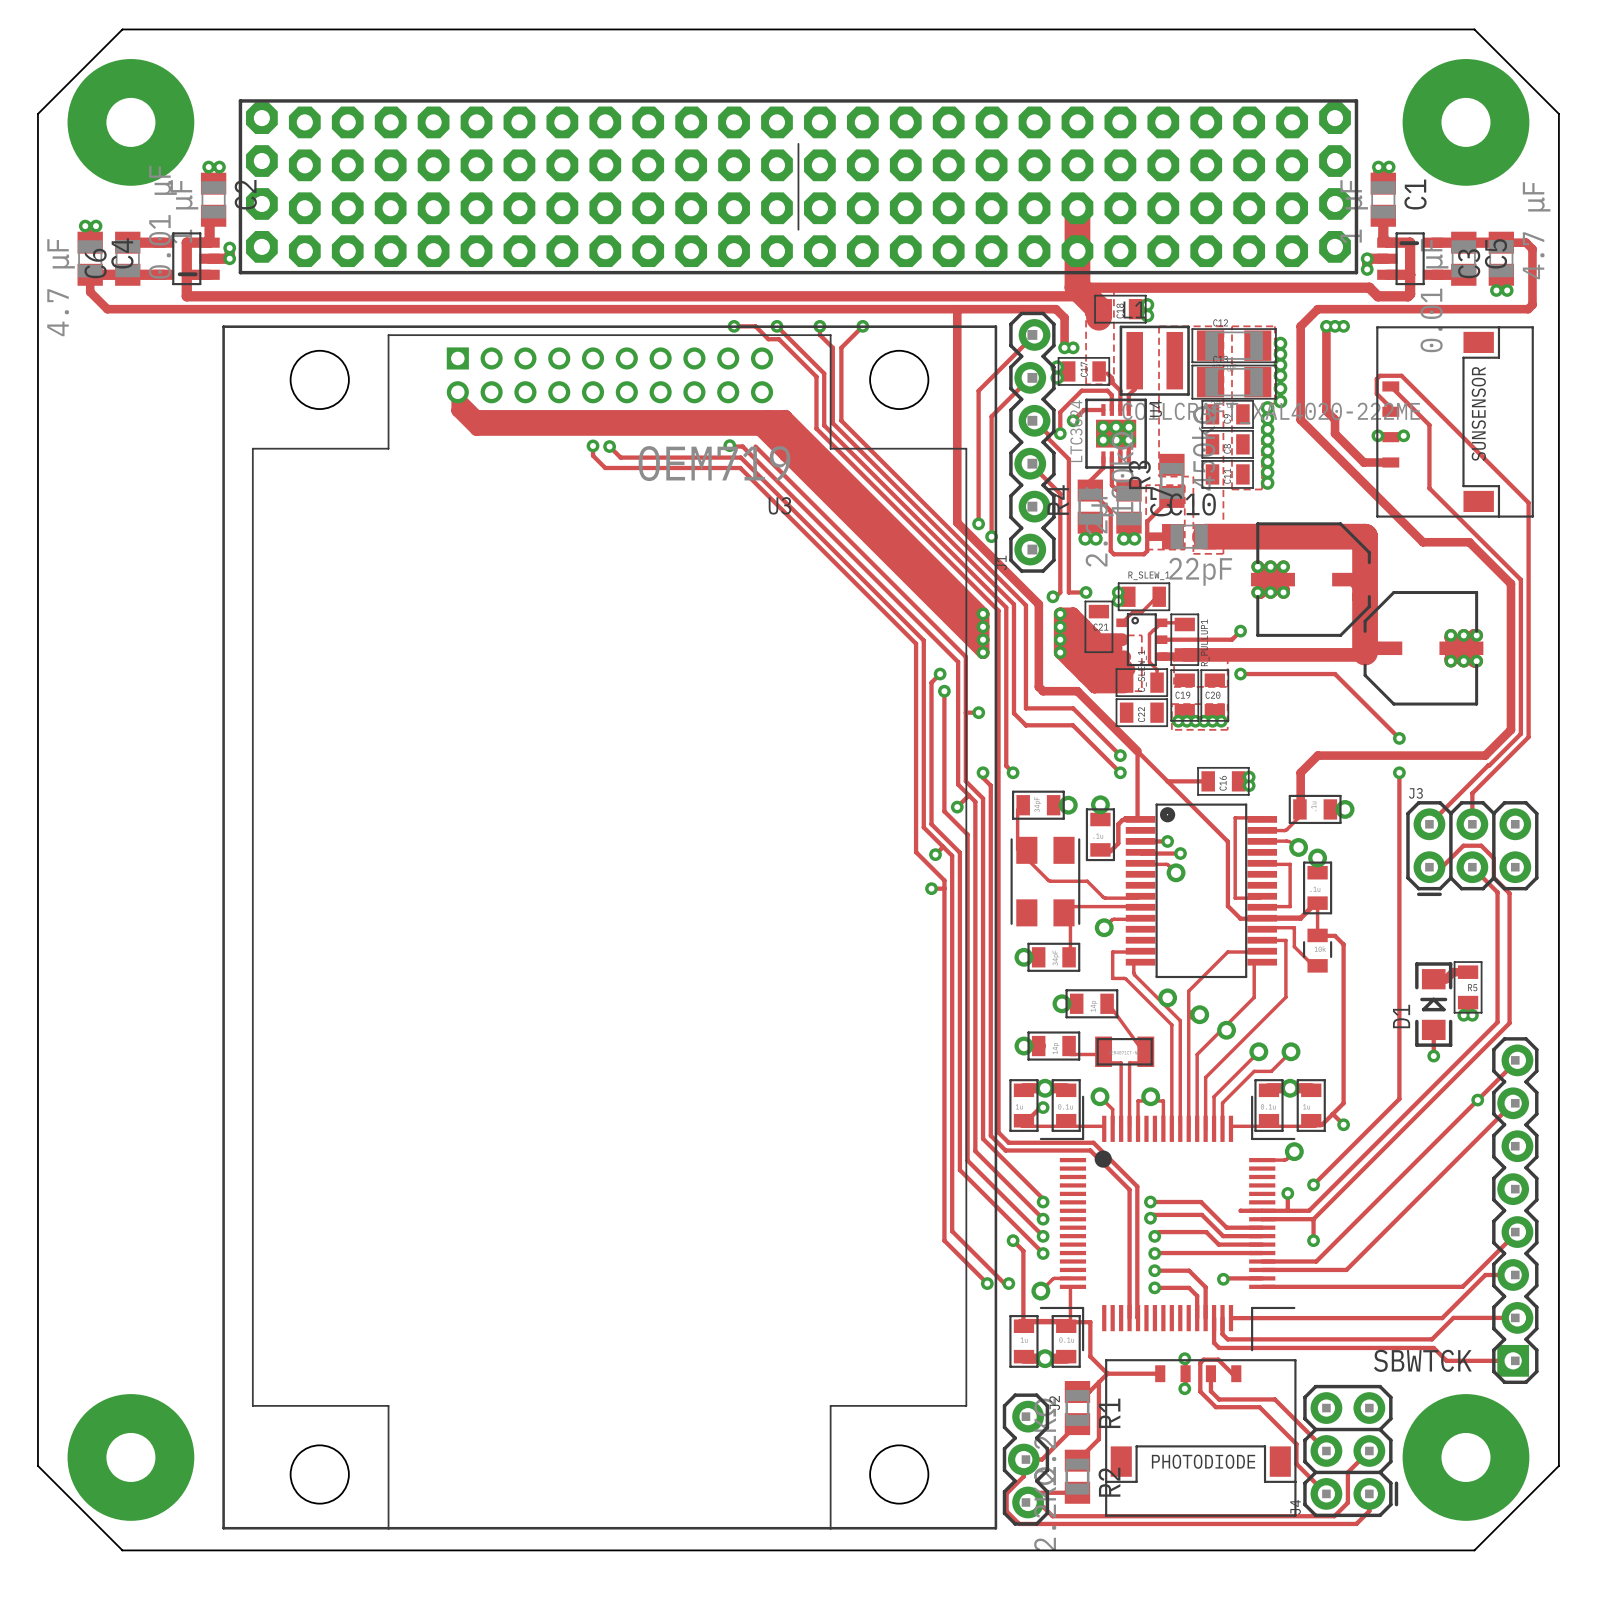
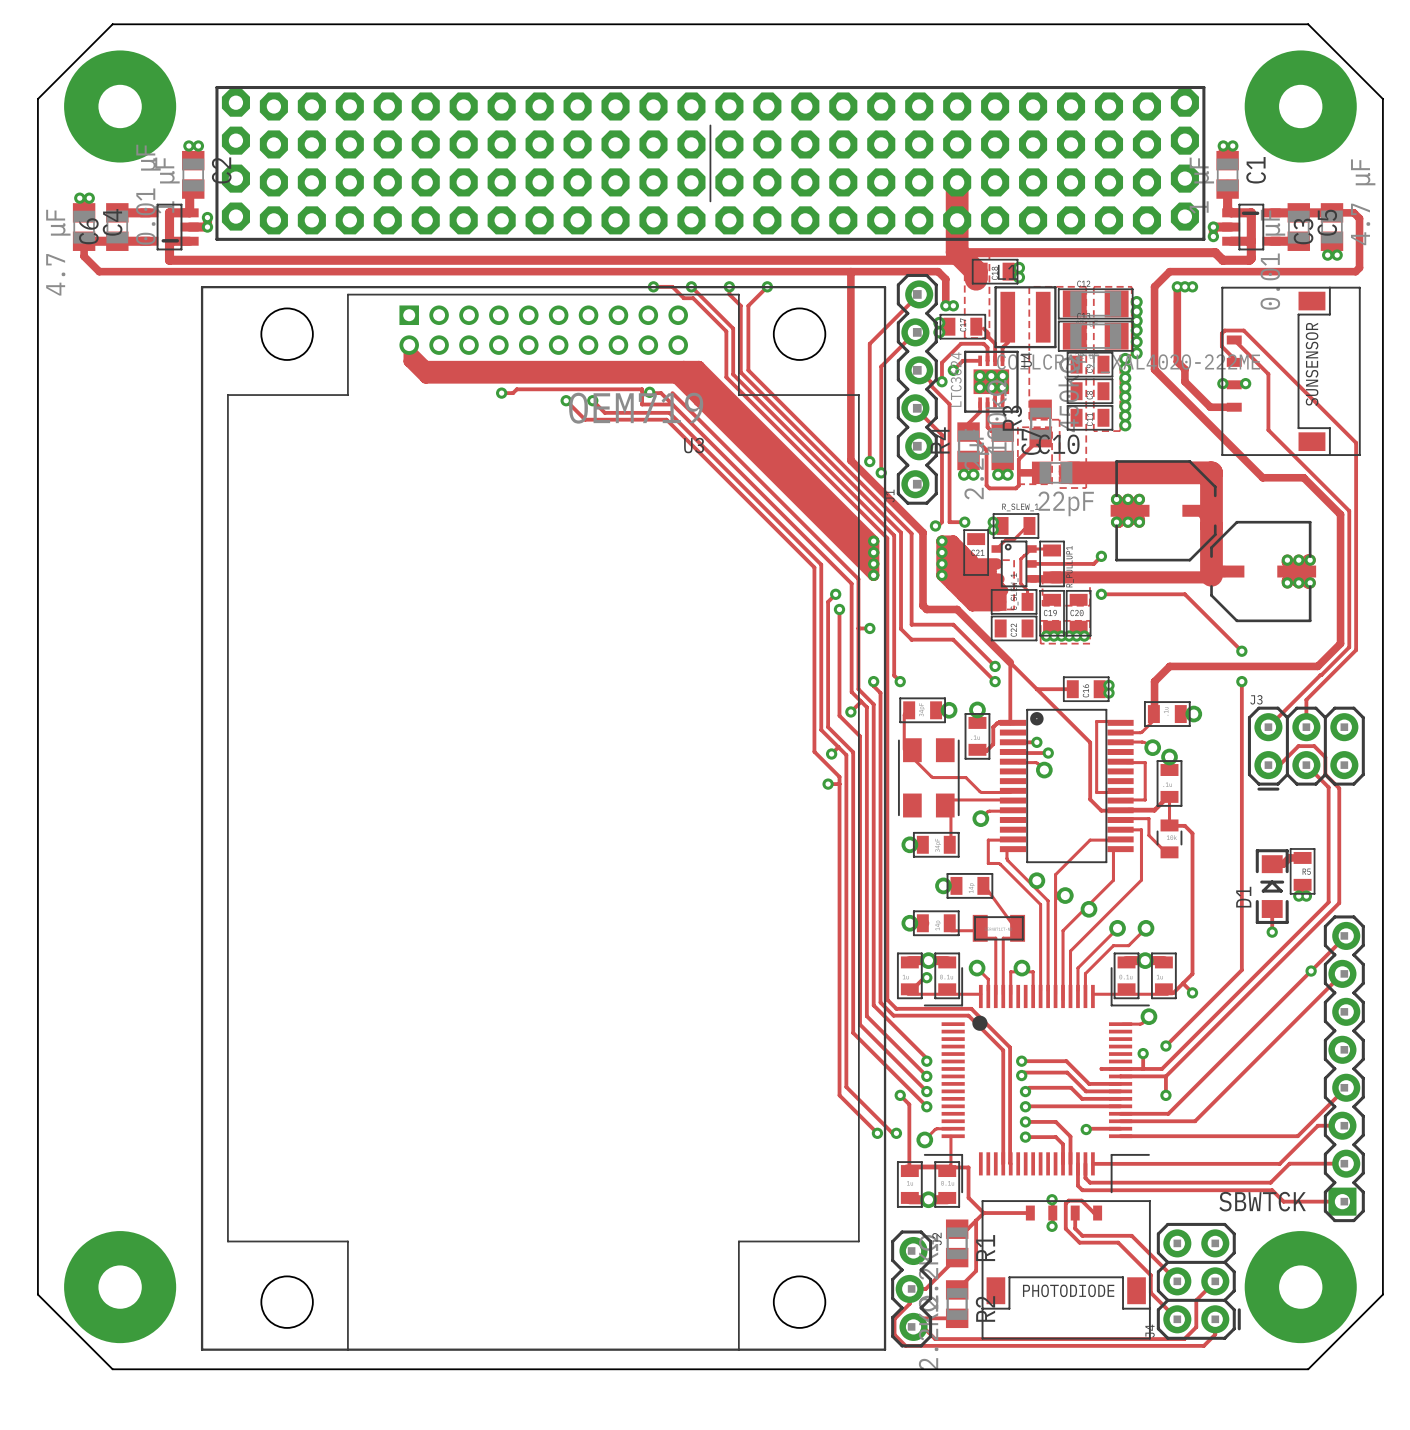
track: (593, 445) (593, 455) (605, 468) (740, 468) (748, 476) -> (566, 400) (585, 419) (666, 419)
via: (593, 445) -> none
track: none -> (501, 393) (513, 393) (516, 389) (642, 389) (642, 404) (672, 404)
via: none -> (501, 393)
track: (609, 446) (620, 457) (740, 457) (752, 468) -> (592, 400) (604, 412) (669, 412)
via: (609, 446) -> none
via: none -> (566, 400)
via: none -> (592, 400)

